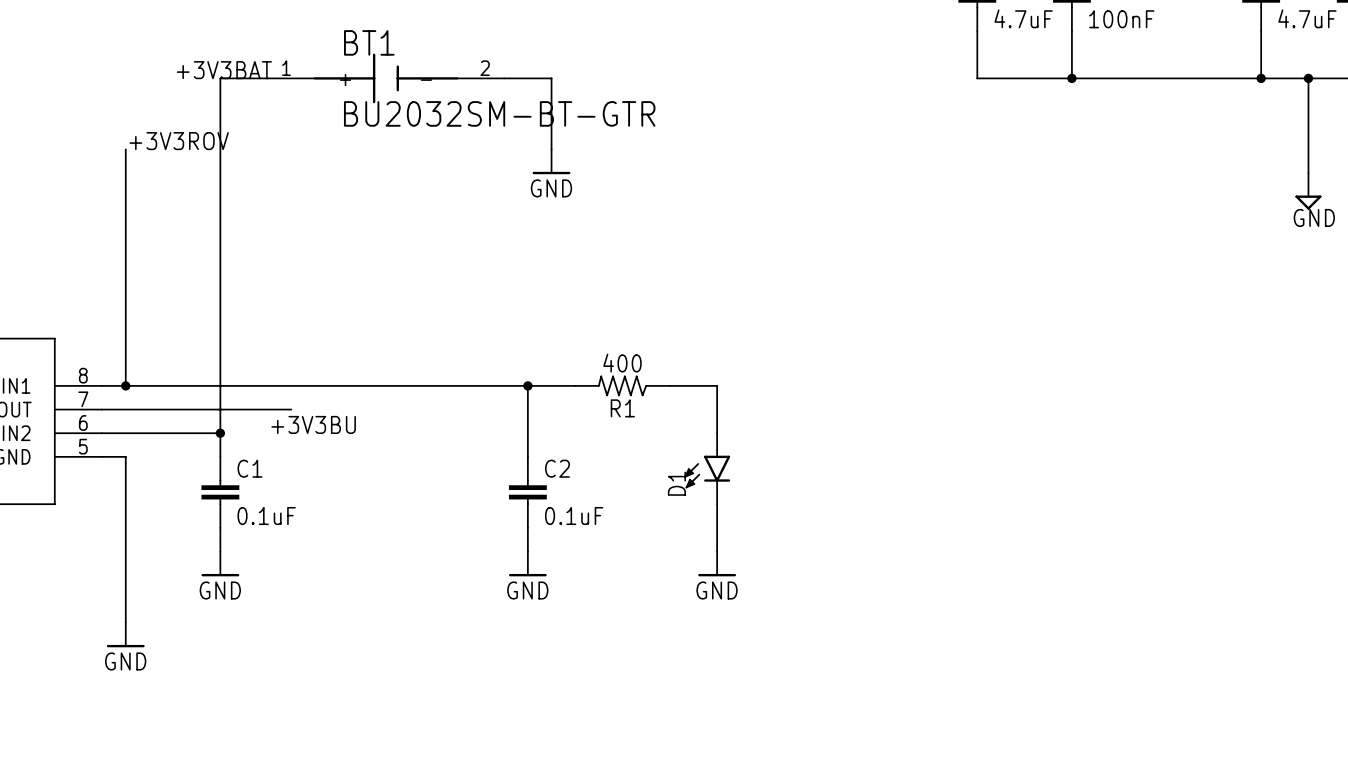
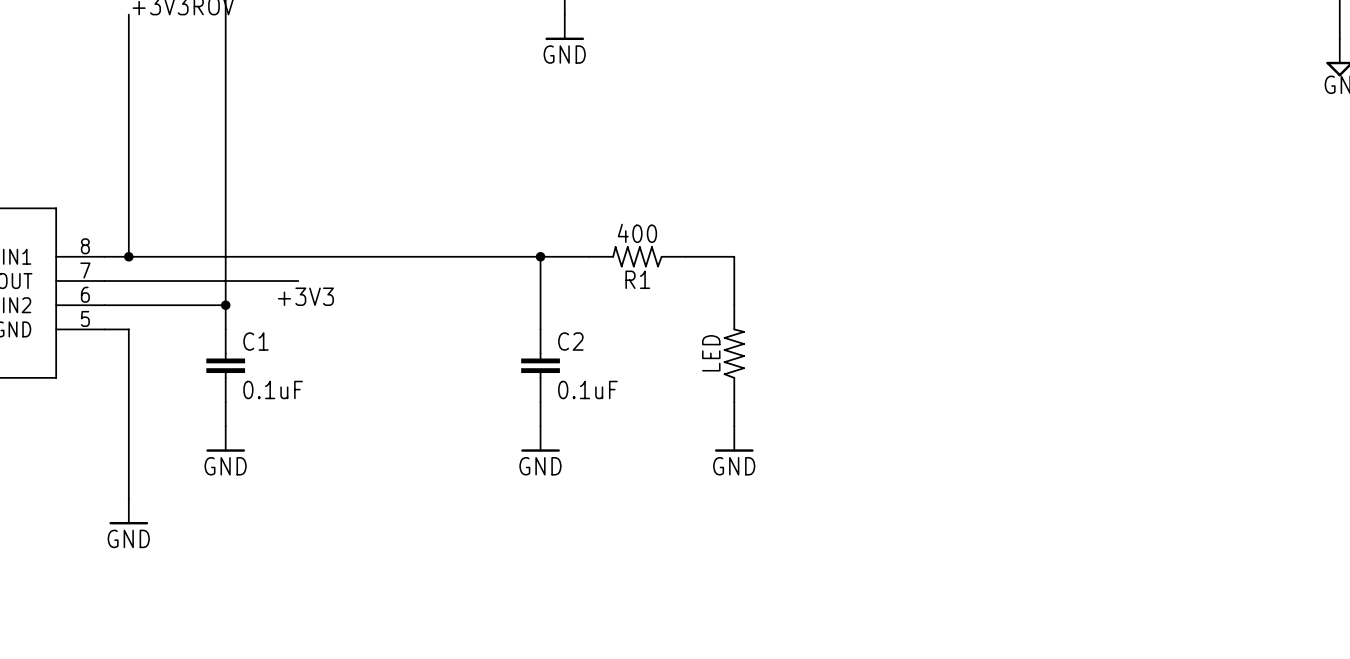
label: +3V3BU (313, 424) -> +3V3 (305, 296)
D1: (707, 468) -> none
LED: none -> (734, 353)

